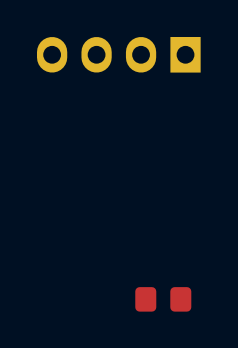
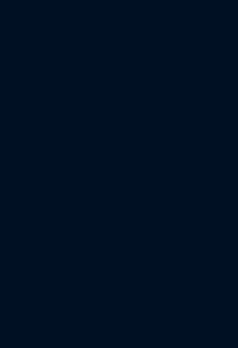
part: (118, 54) -> none
part: (163, 299) -> none

